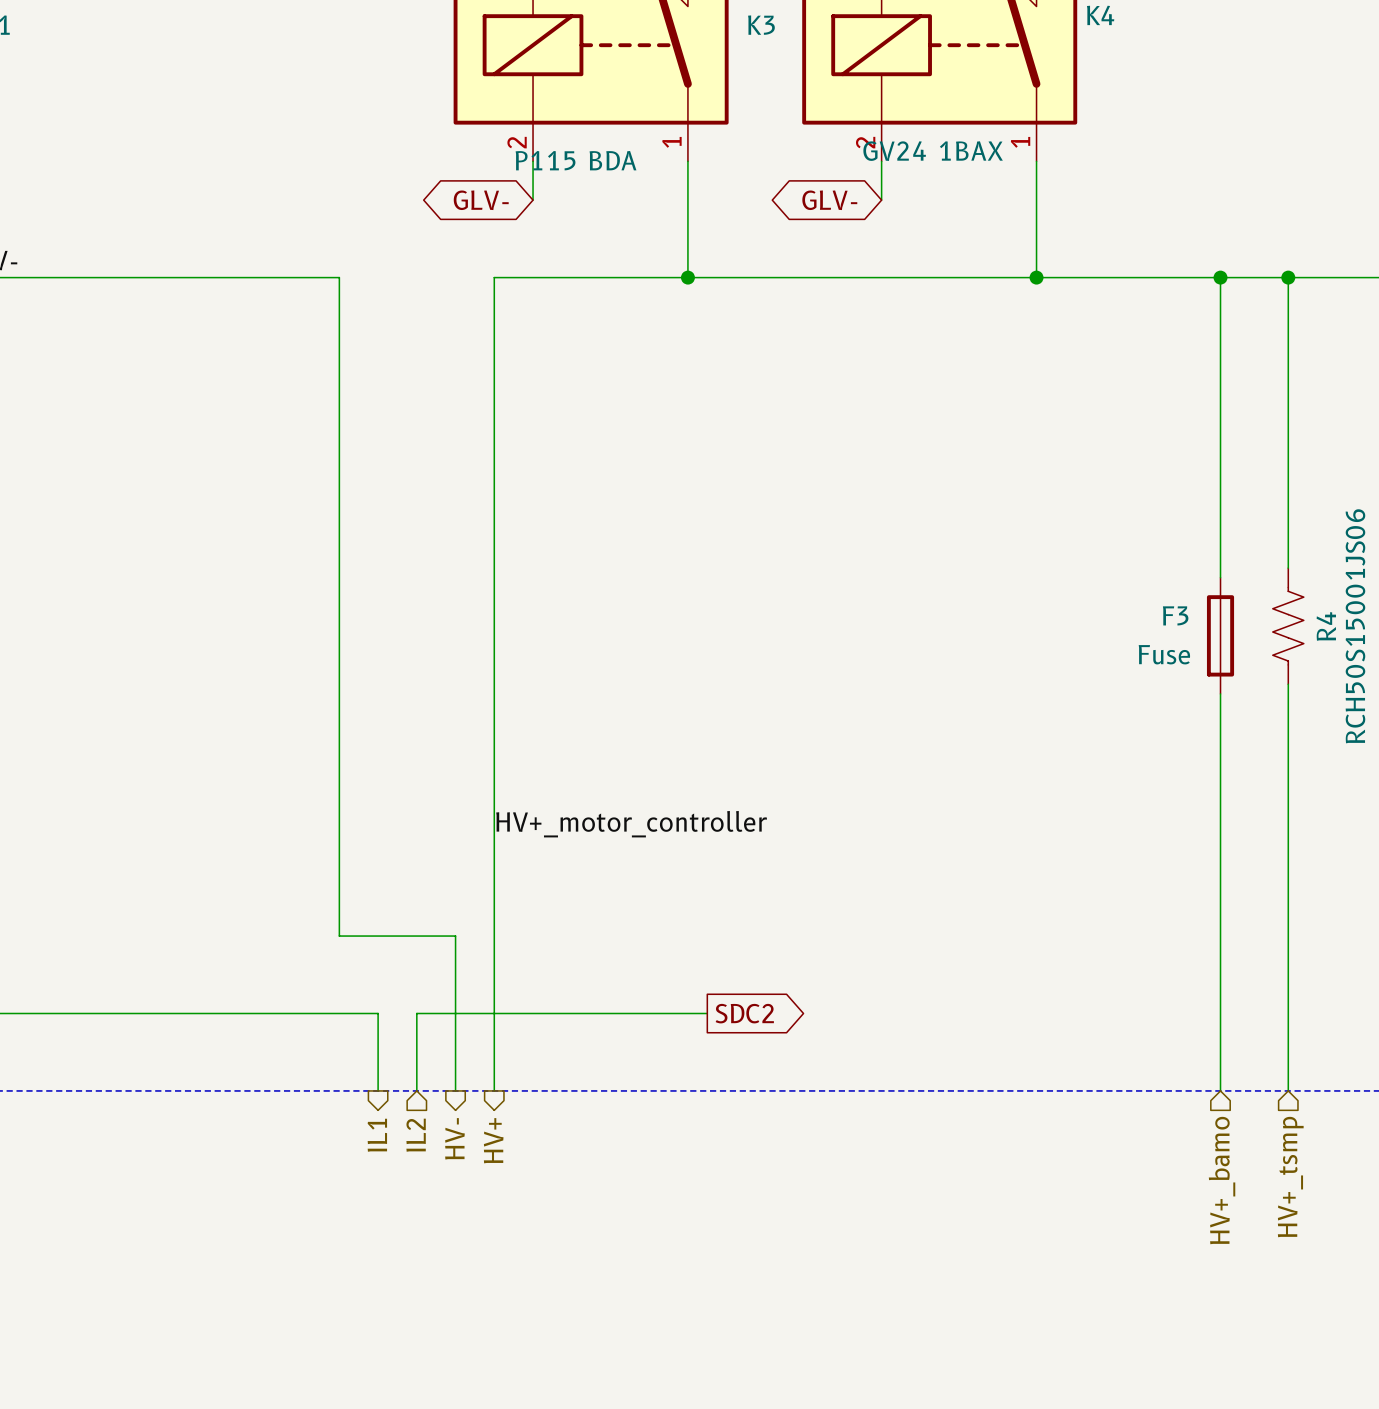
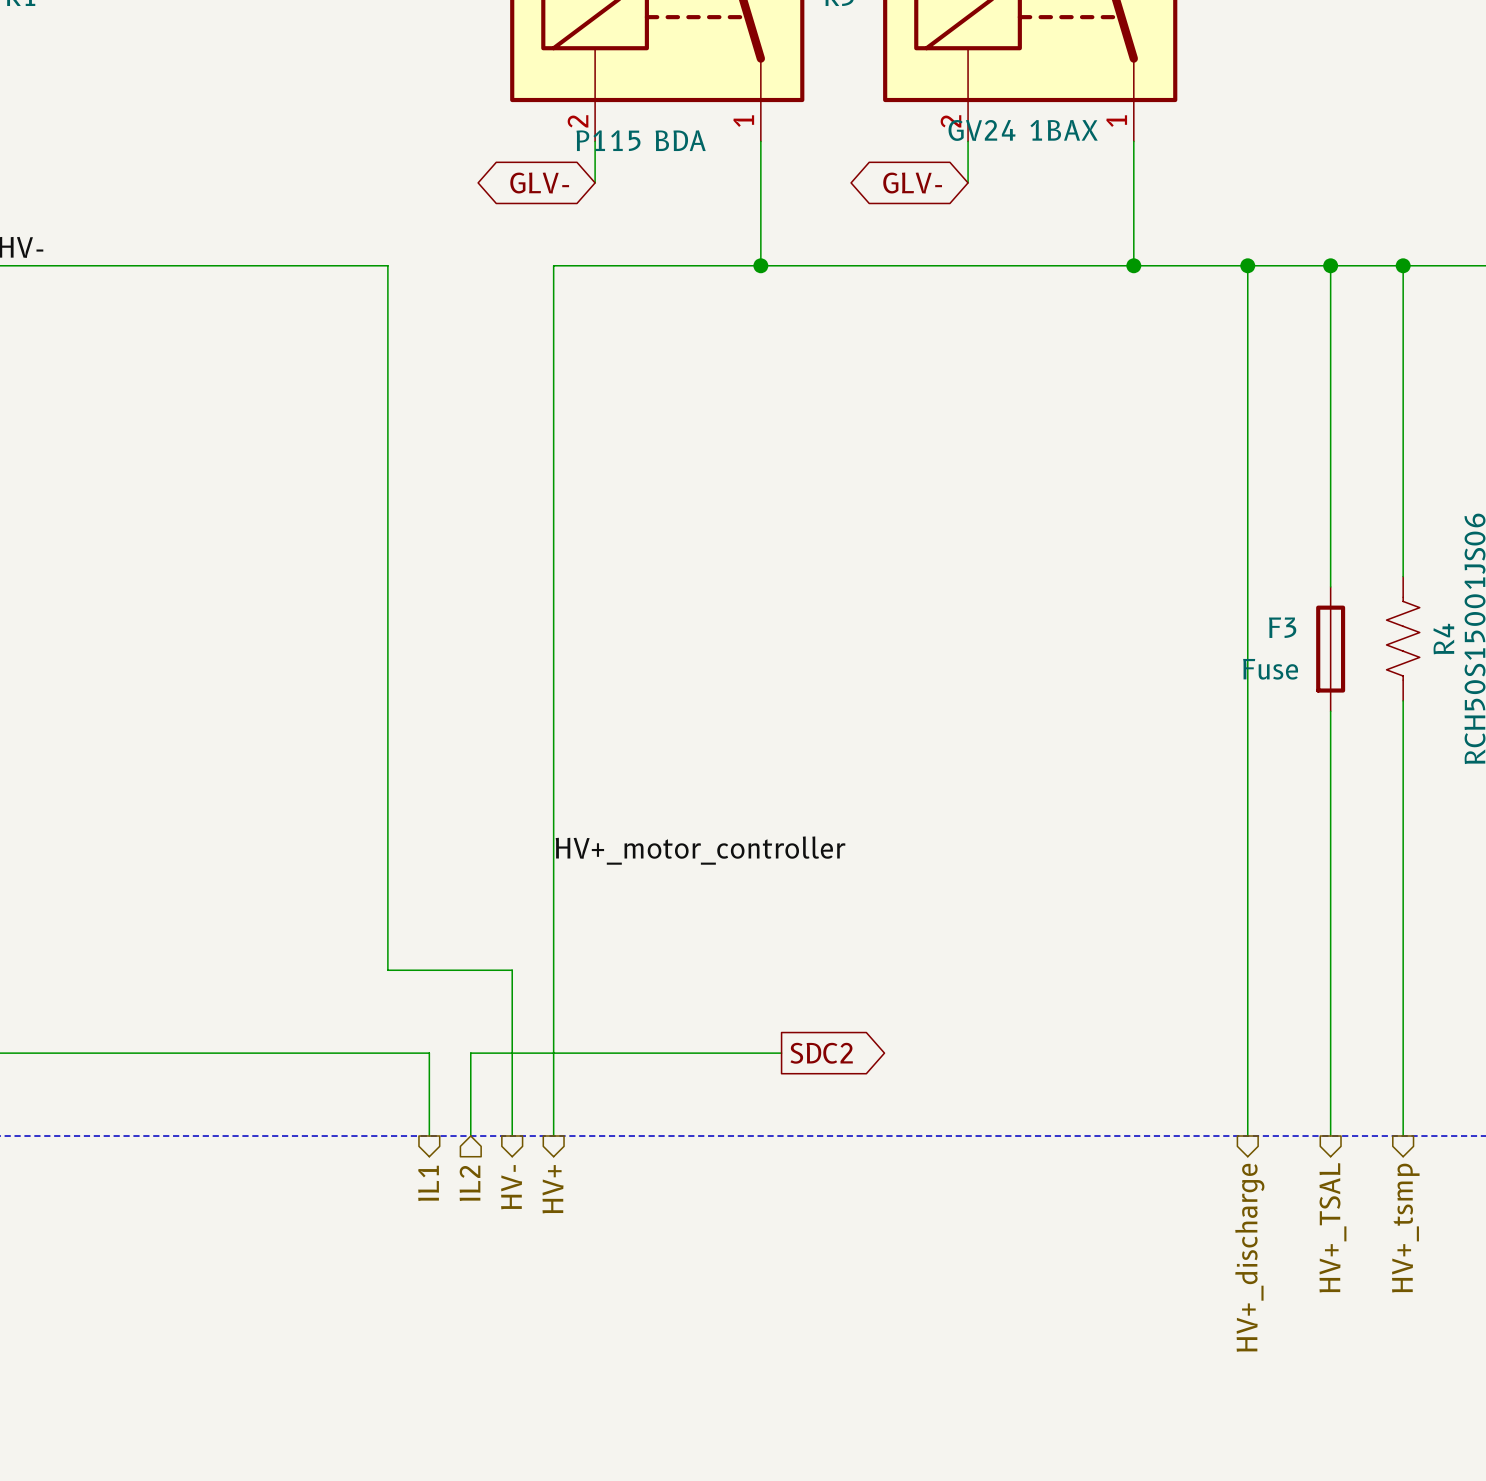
wire: none -> (1247, 265) (1247, 1136)
junction: none -> (1247, 265)
hierarchical label shape: input (1290, 1177) -> output (1405, 1228)
hierarchical label shape: input (1222, 1180) -> output (1332, 1227)
hierarchical label: HV+_bamo (1222, 1180) -> HV+_TSAL (1332, 1227)
hierarchical label: none -> HV+_discharge (1249, 1257)

